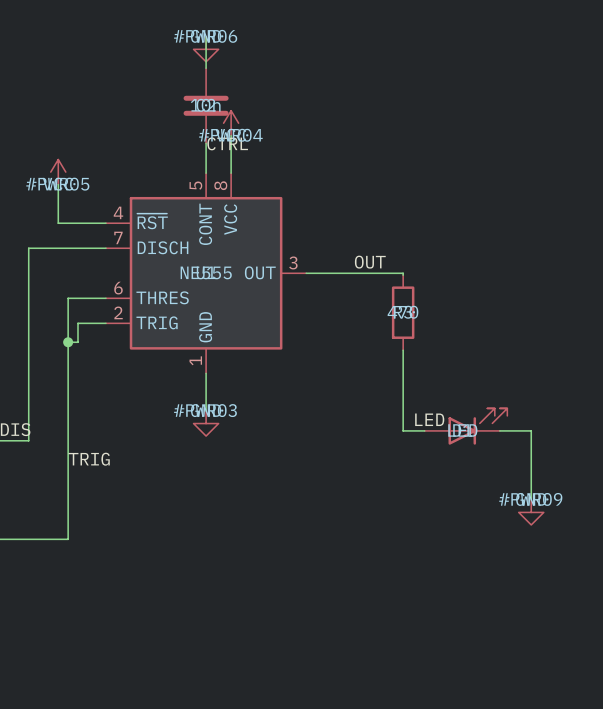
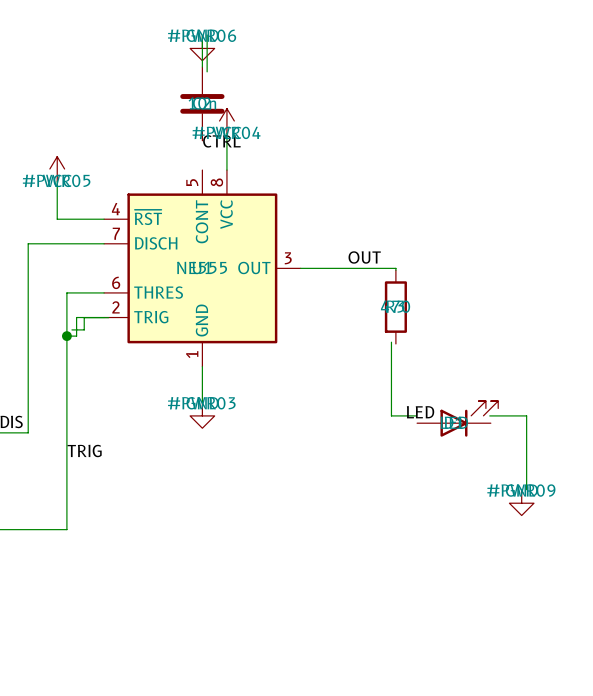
wire: none -> (207, 34) (207, 71)
wire: (206, 143) (206, 173) -> none
wire: none -> (108, 317) (84, 317) (84, 329) (71, 329)
wire: none -> (391, 342) (391, 415) (416, 415)
wire: (403, 350) (403, 430) (424, 430) -> none
wire: none -> (489, 415) (526, 415) (526, 489)
wire: (499, 430) (531, 430) (531, 499) -> none

